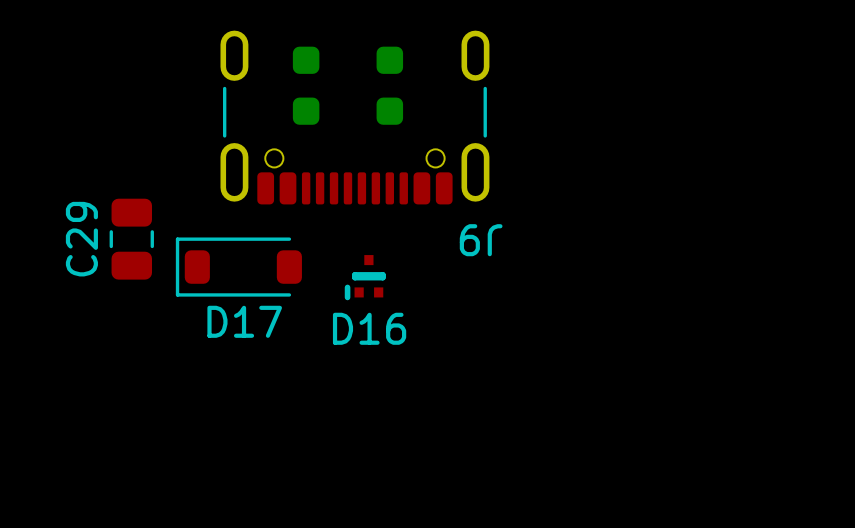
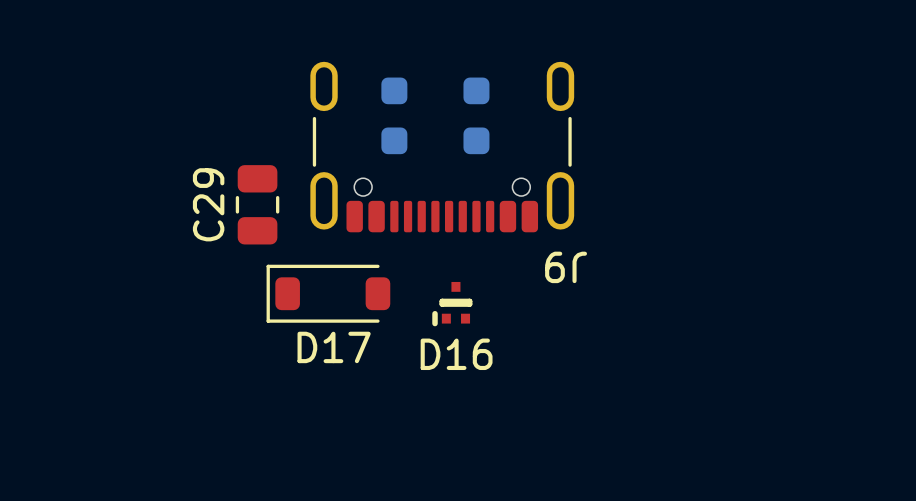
C29 position: (131, 239) -> (257, 204)

